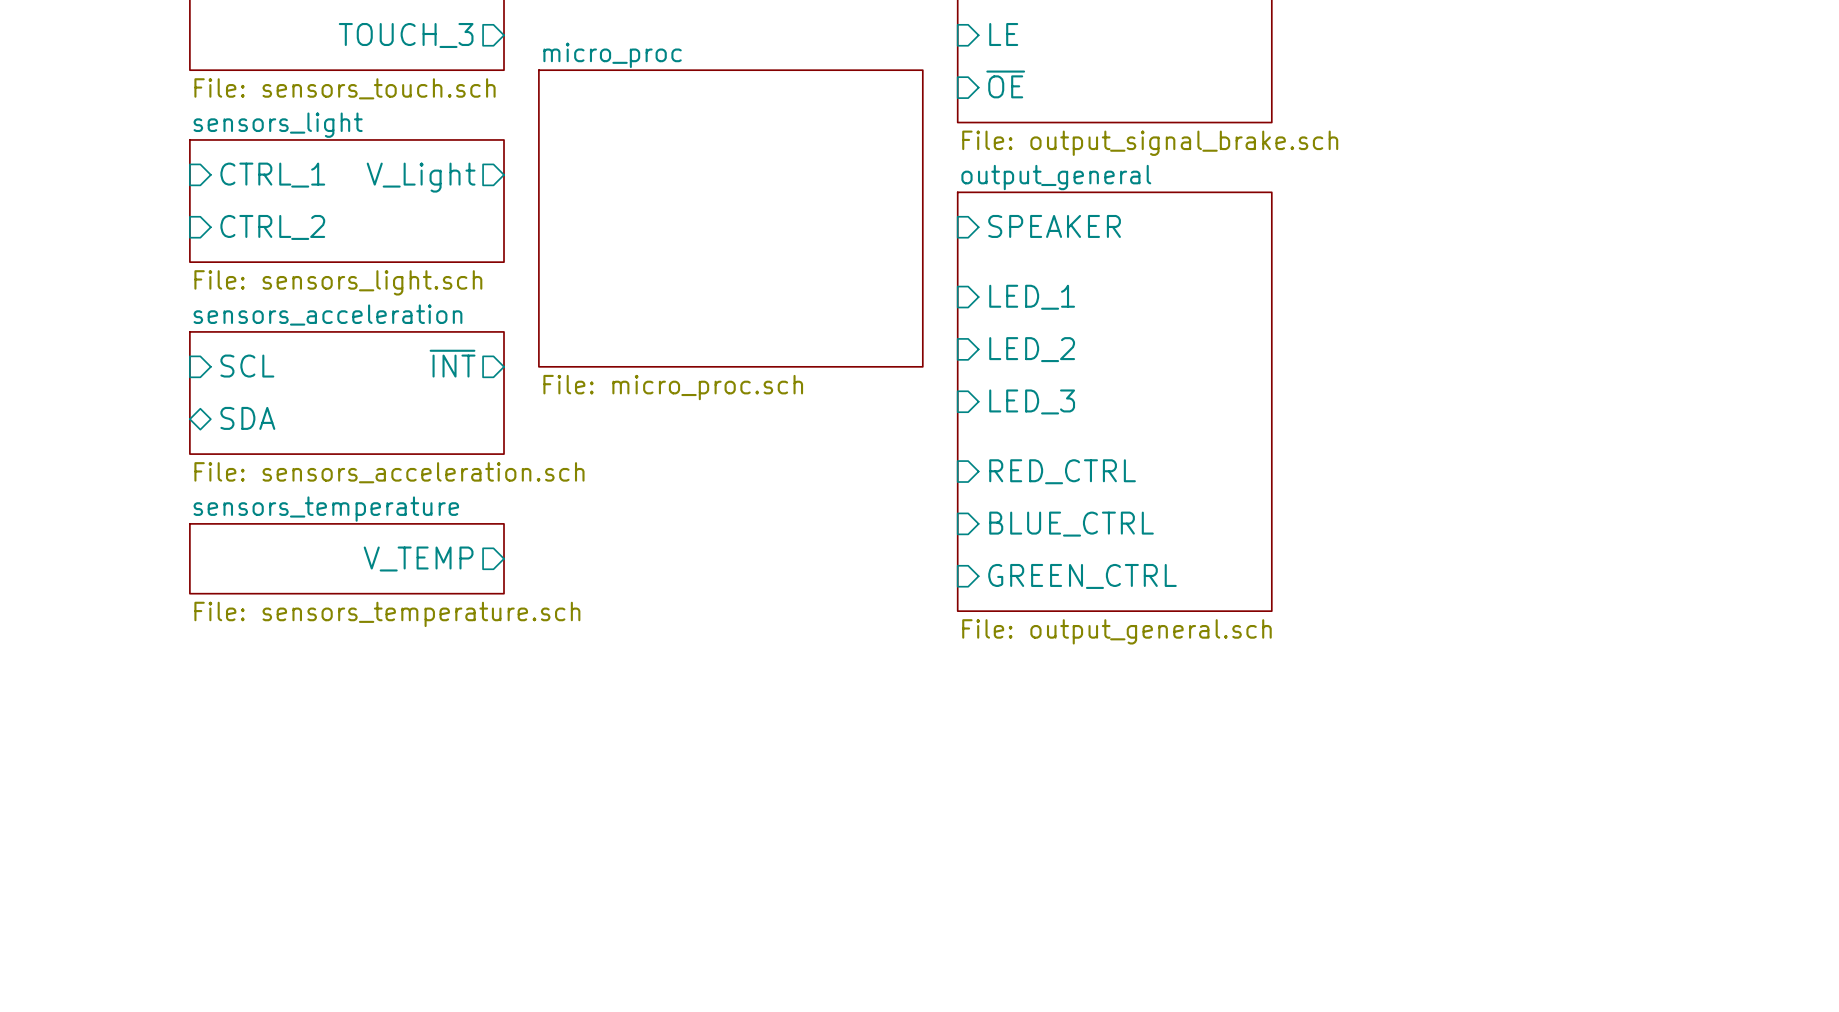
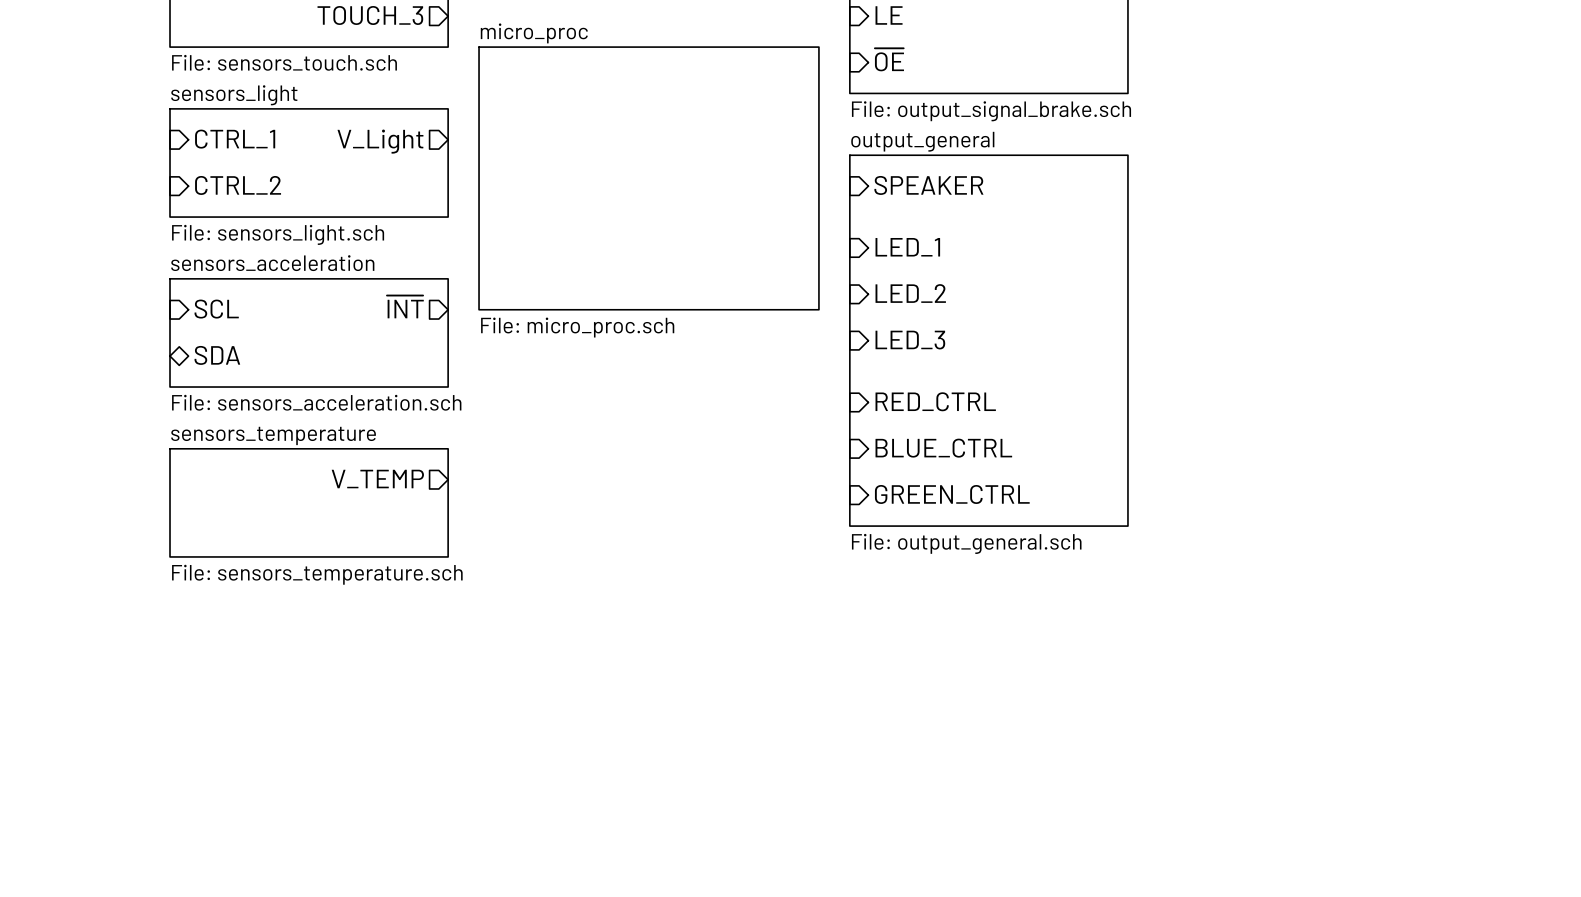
sheet sensors_temperature: File: sensors_temperature.sch (346, 558) -> none
sheet sensors_temperature: none -> File: sensors_temperature.sch (309, 502)

